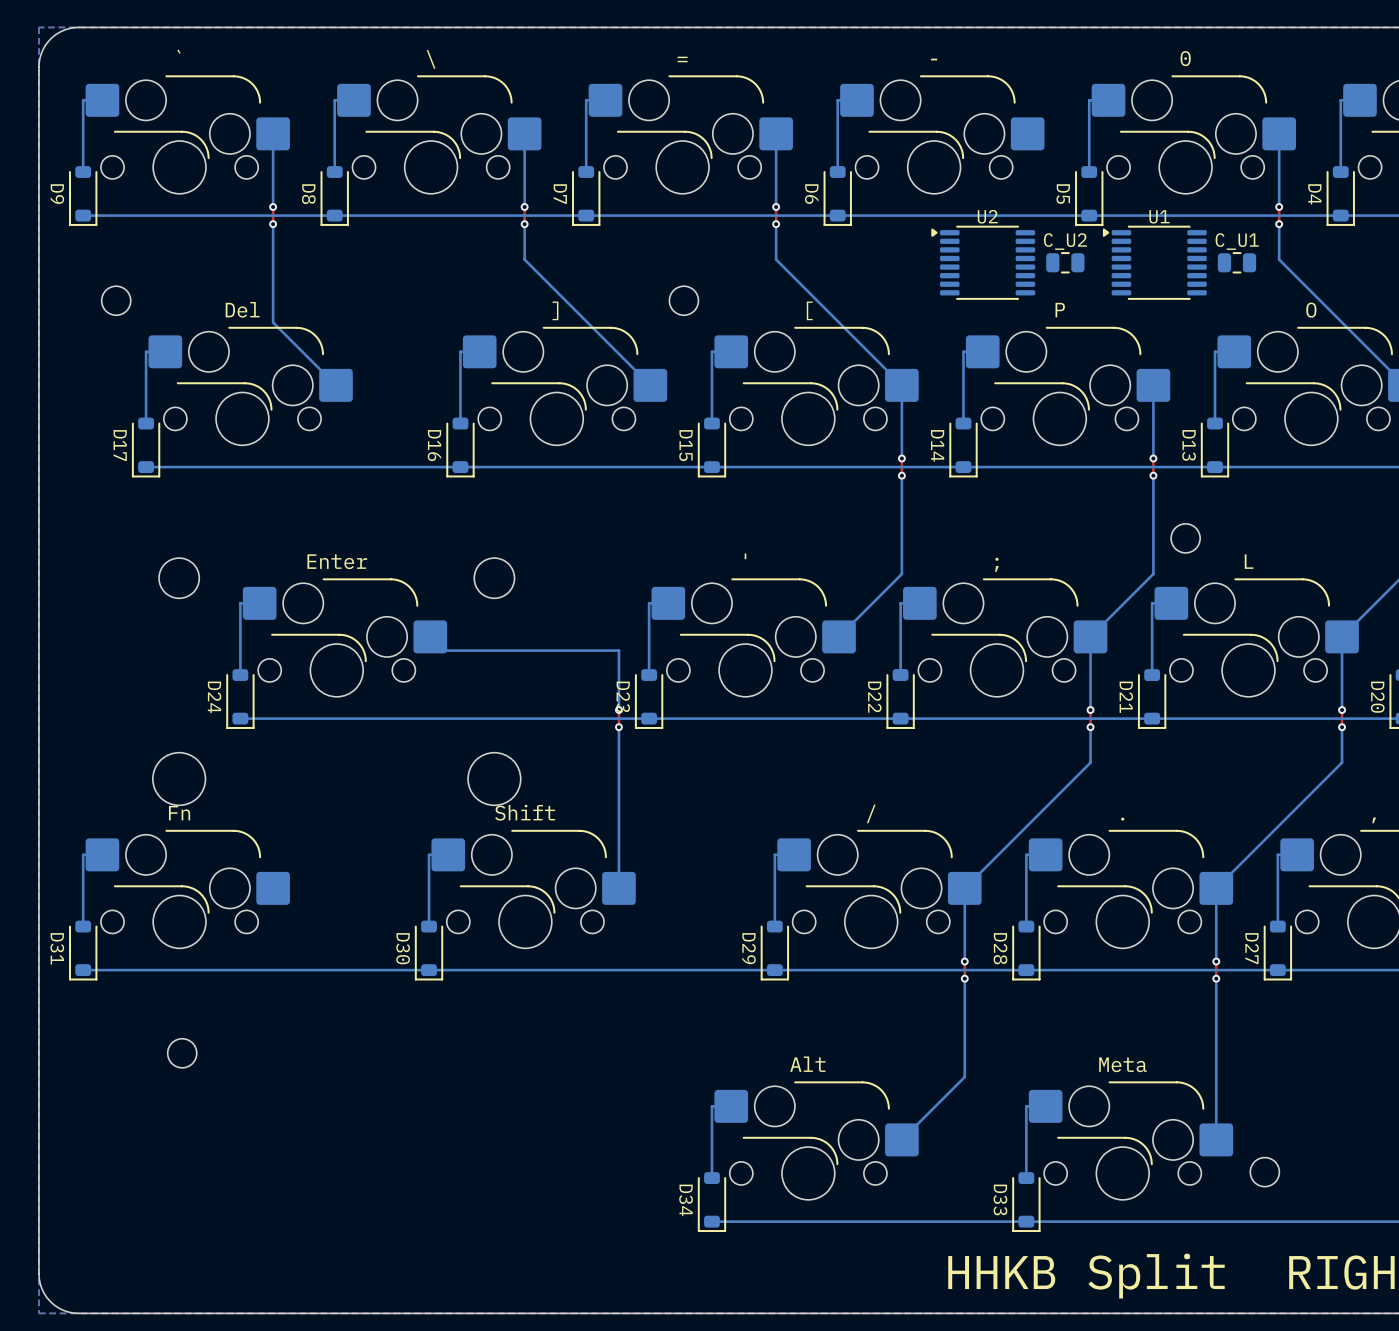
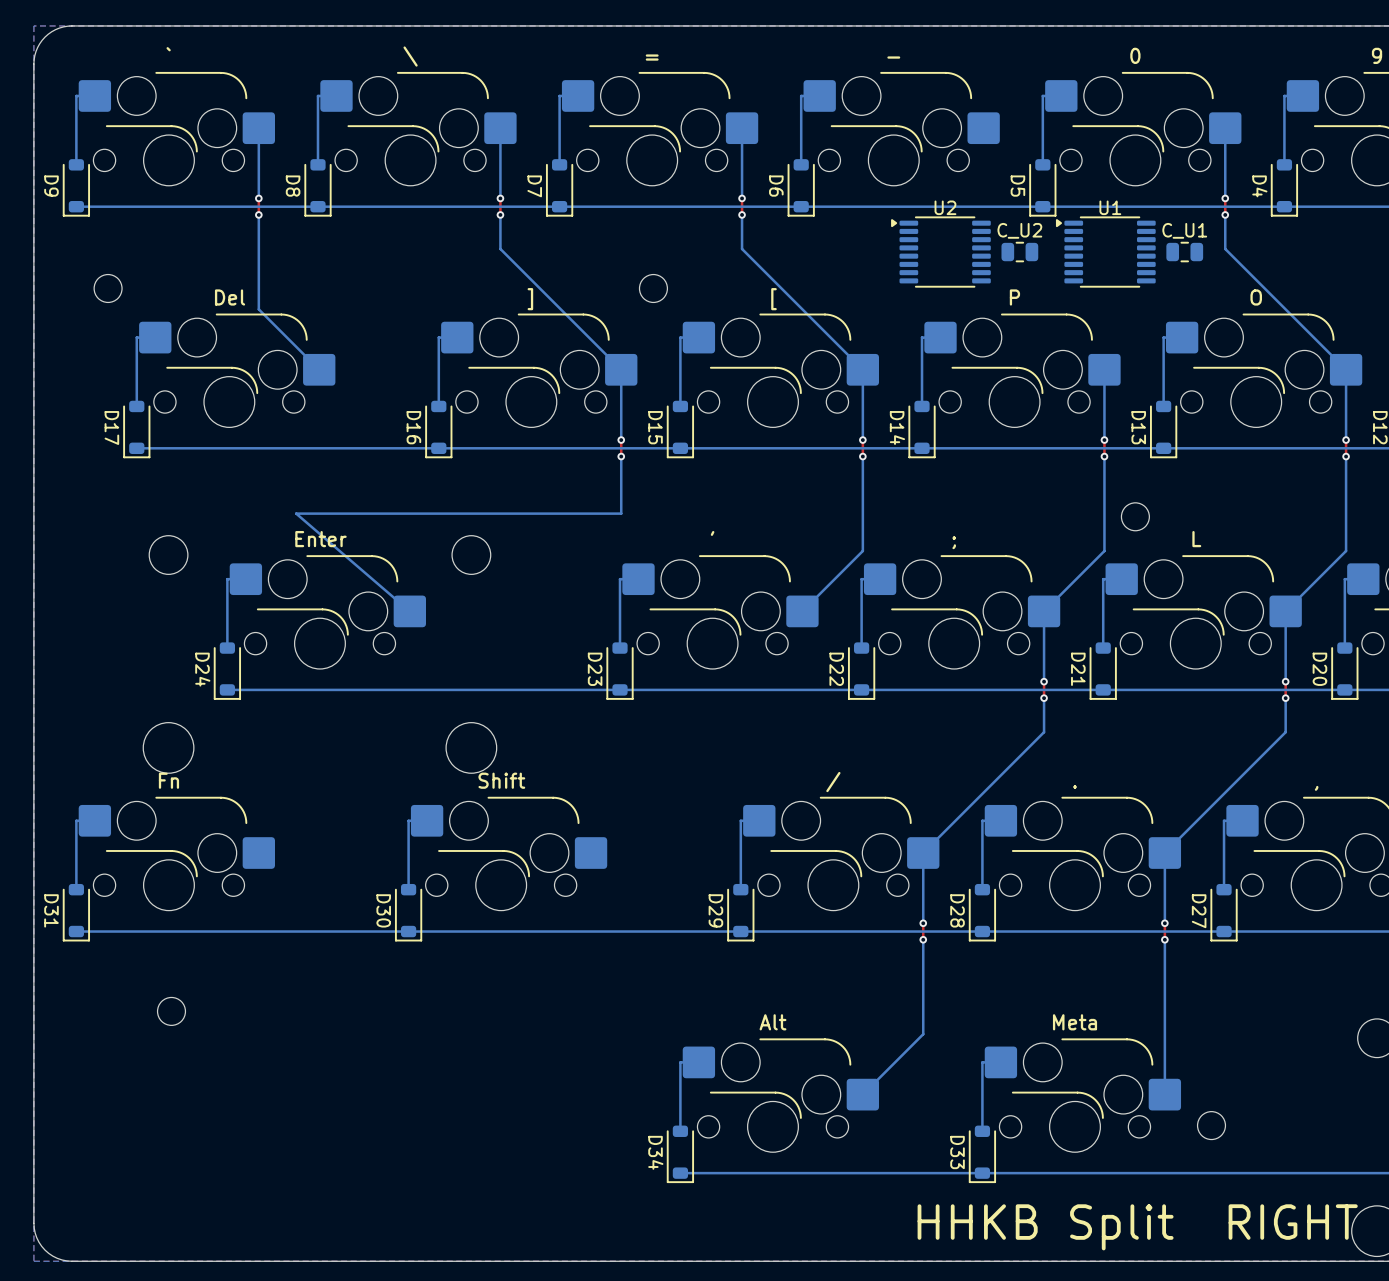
bottom track: none -> (621, 369) (621, 440)
via: none -> (621, 440)
via: none -> (621, 456)
bottom track: (430, 636) (430, 650) (618, 650) (618, 710) -> (409, 611) (296, 513) (621, 513) (621, 456)
top track: (618, 710) (618, 727) -> (621, 440) (621, 456)
via: (618, 710) -> none
bottom track: (618, 727) (618, 888) -> none
via: (618, 727) -> none

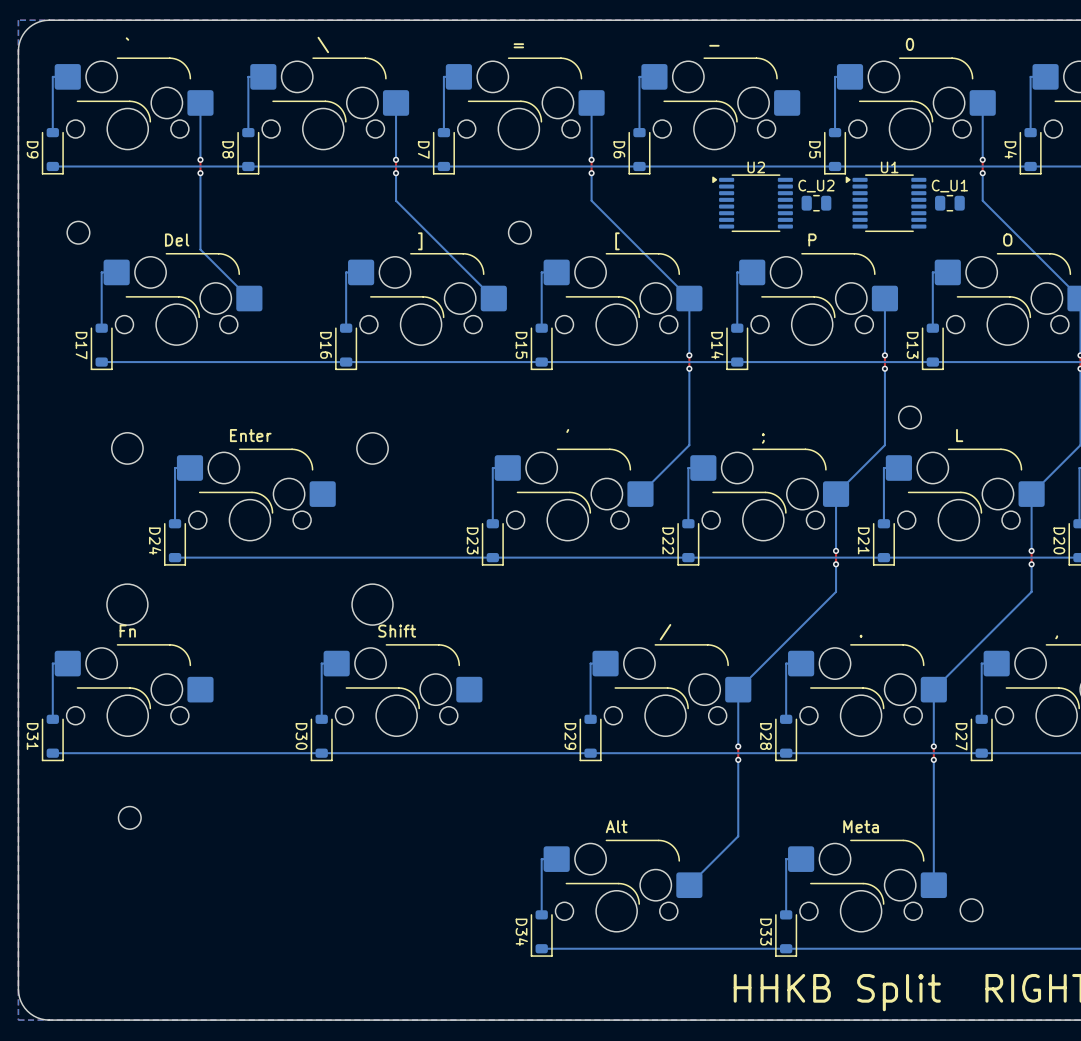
bottom track: (621, 369) (621, 440) -> none
top track: (621, 440) (621, 456) -> none
via: (621, 440) -> none
bottom track: (621, 456) (621, 513) (296, 513) (409, 611) -> none
via: (621, 456) -> none

